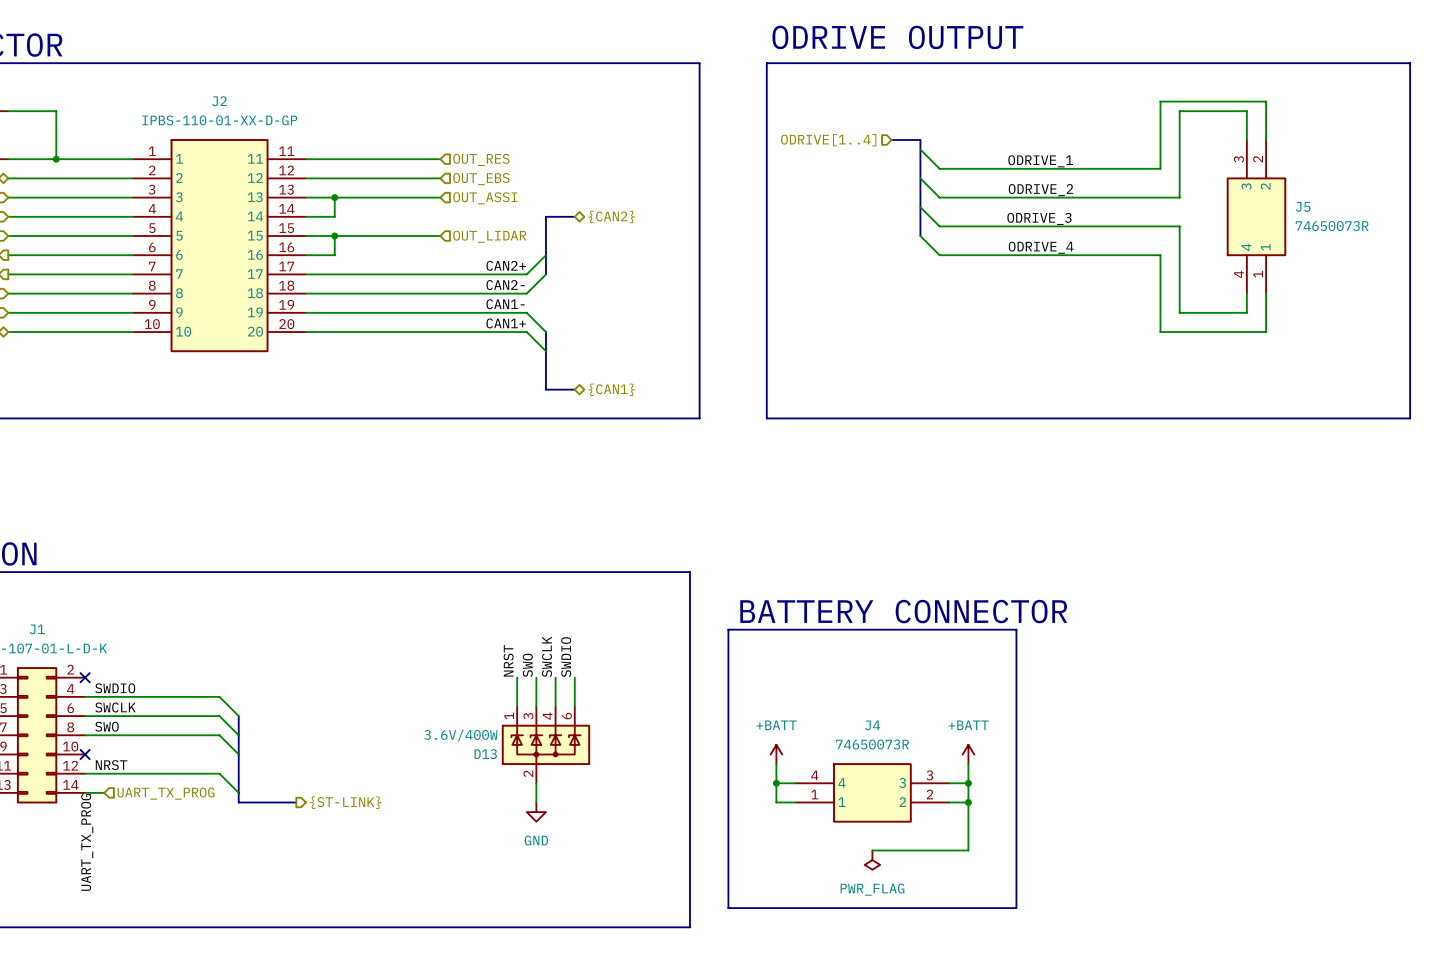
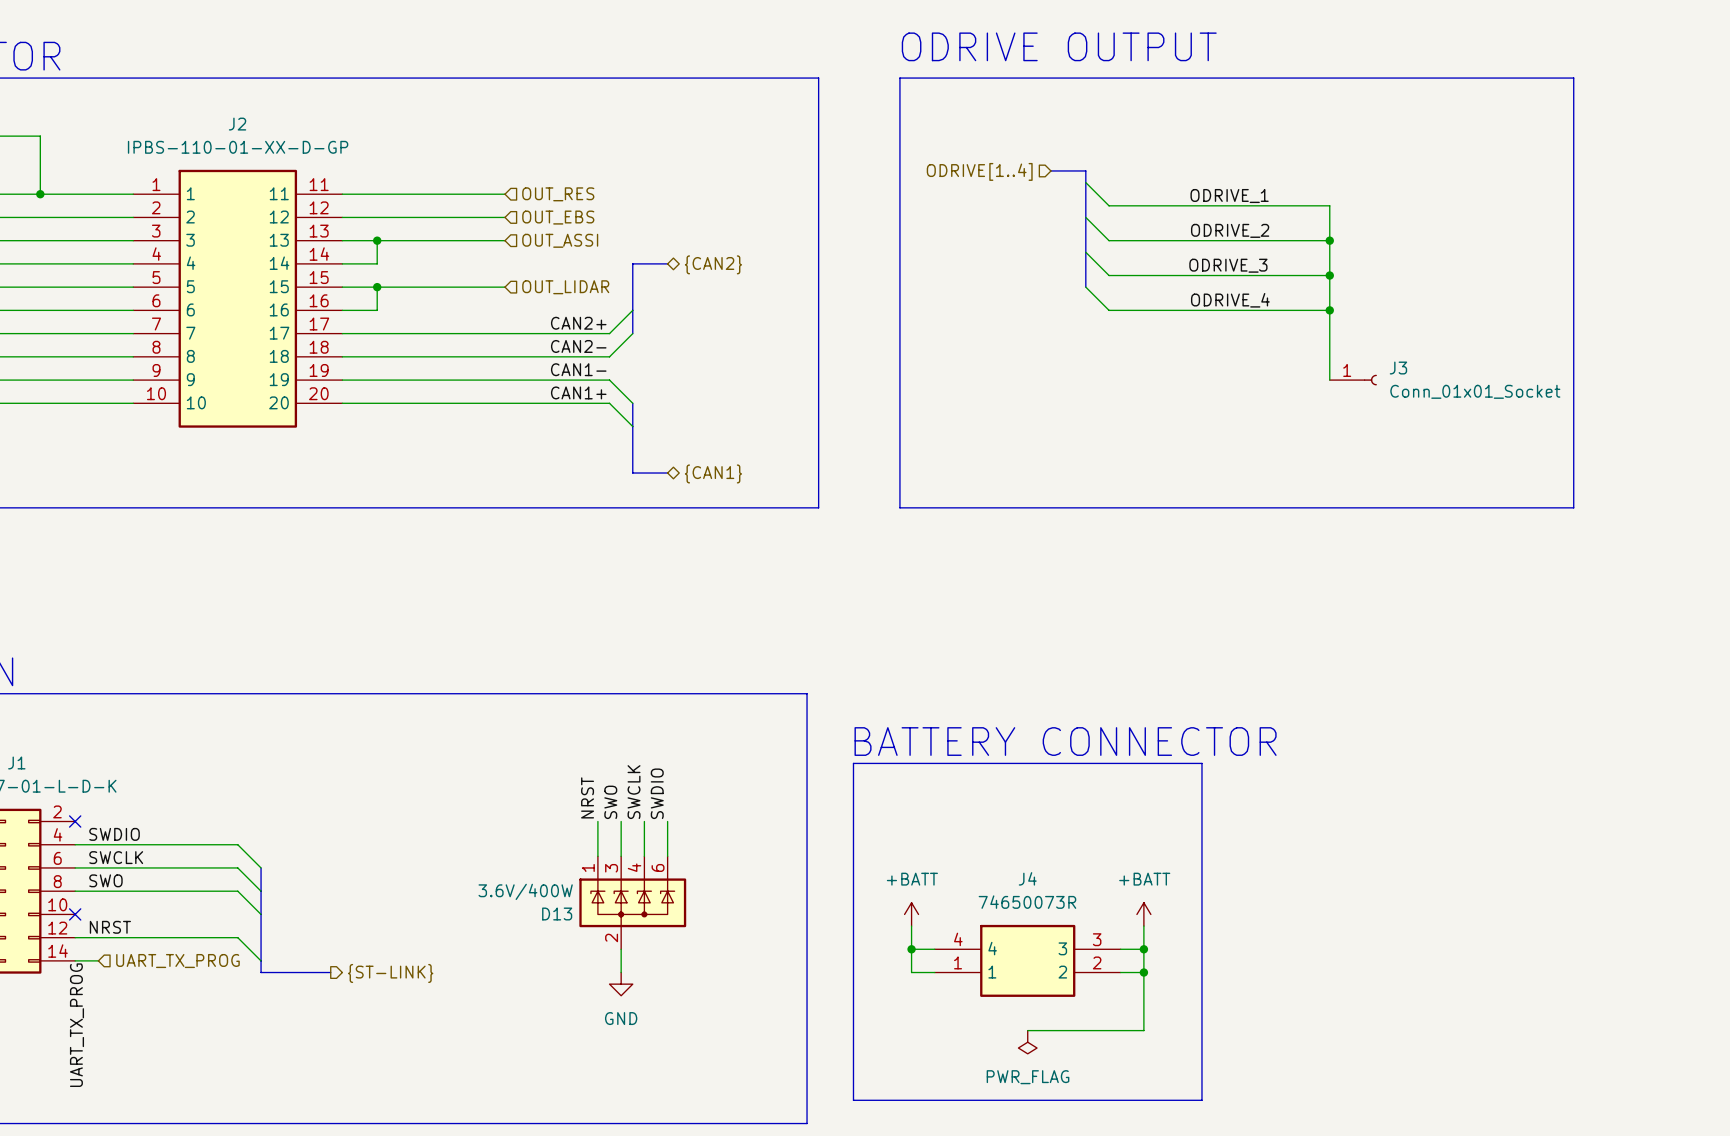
line: (1323, 63) (1410, 63) (1410, 418) (1323, 418) -> (1573, 78) (1573, 507)
wire: (1246, 139) (1246, 111) (1179, 111) (1179, 197) (1122, 197) -> none
wire: (1266, 139) (1266, 101) (1160, 101) (1160, 168) (1122, 168) -> (1329, 380) (1329, 205)
junction: none -> (1329, 240)
J5: 74650073R (1256, 216) -> none
wire: (1122, 226) (1179, 226) (1179, 312) (1246, 312) (1246, 293) -> none
junction: none -> (1329, 275)
wire: (1122, 255) (1160, 255) (1160, 332) (1266, 332) (1266, 293) -> none
junction: none -> (1329, 310)
J3: none -> Conn_01x01_Socket (1353, 380)

